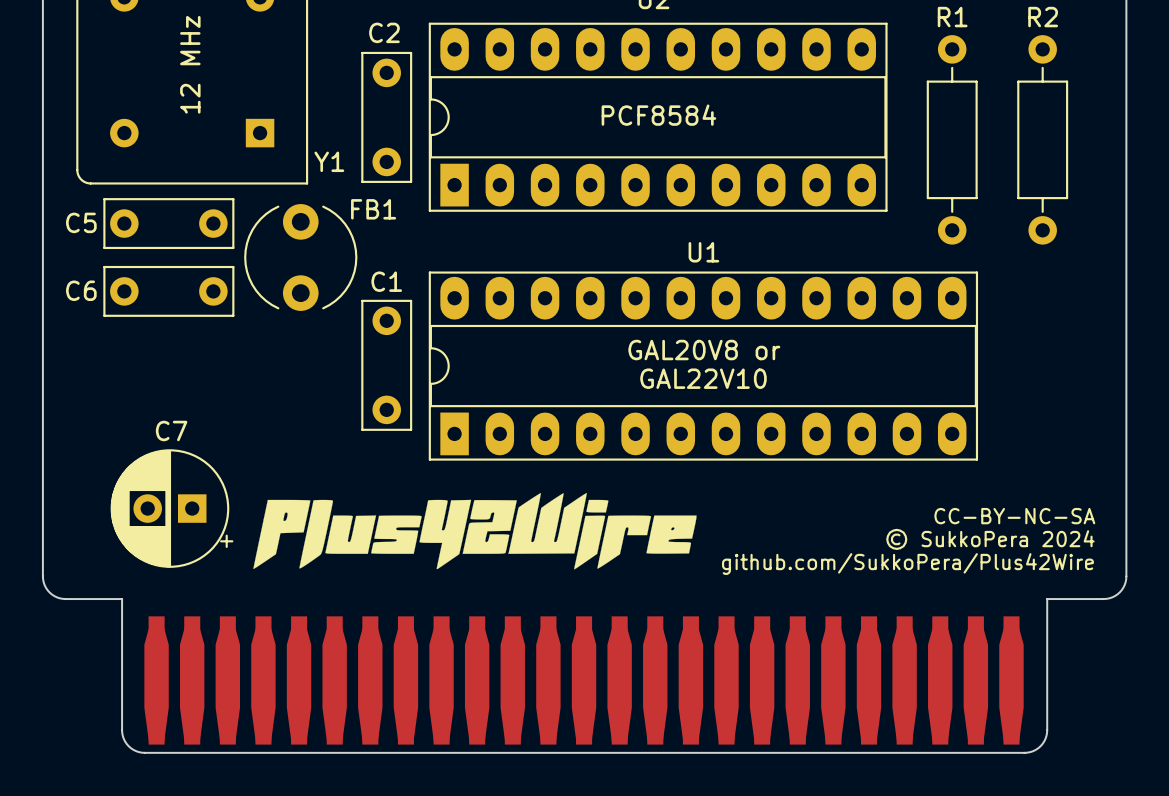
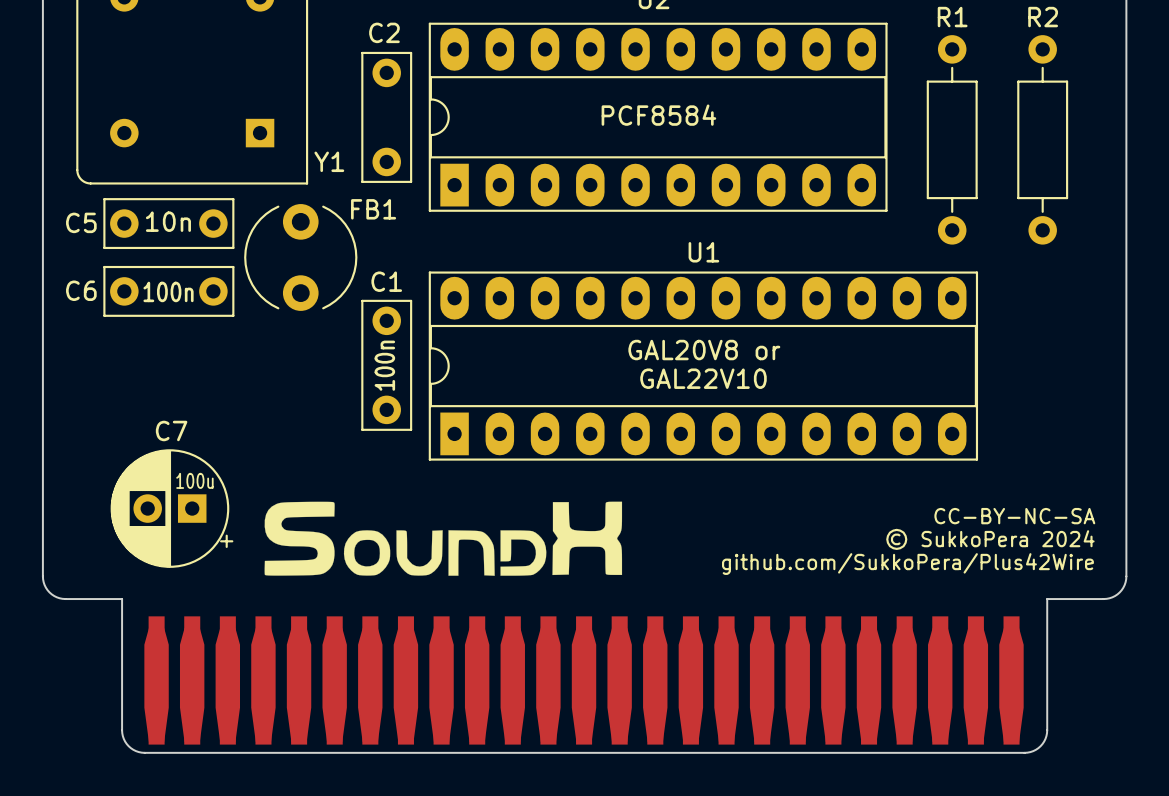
text: 12 MHz (190, 64) -> none
C5 value: none -> 10n (168, 221)
C6 value: none -> 100n (168, 291)
C1 value: none -> 100n (384, 365)
C7 value: none -> 100u (194, 480)
drawing: [253, 492, 697, 570] -> none
drawing: none -> [264, 501, 623, 576]

